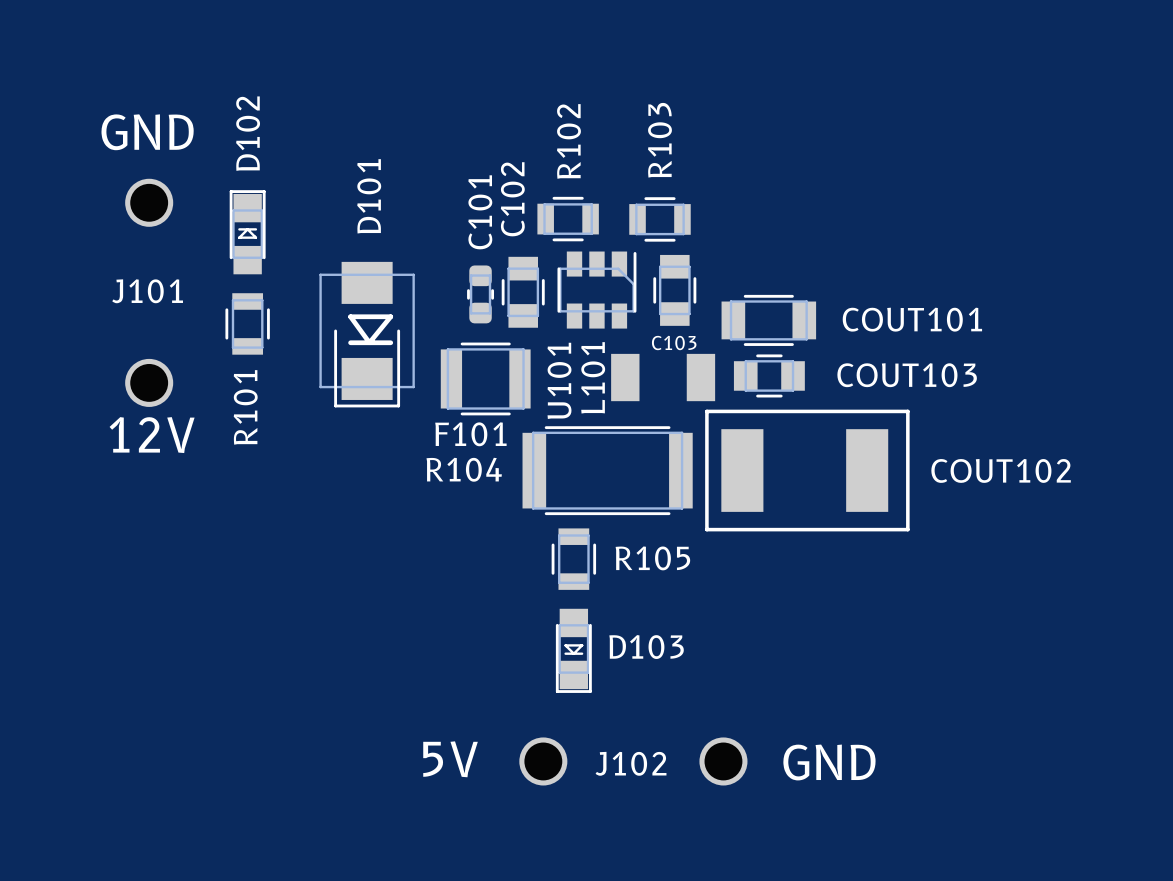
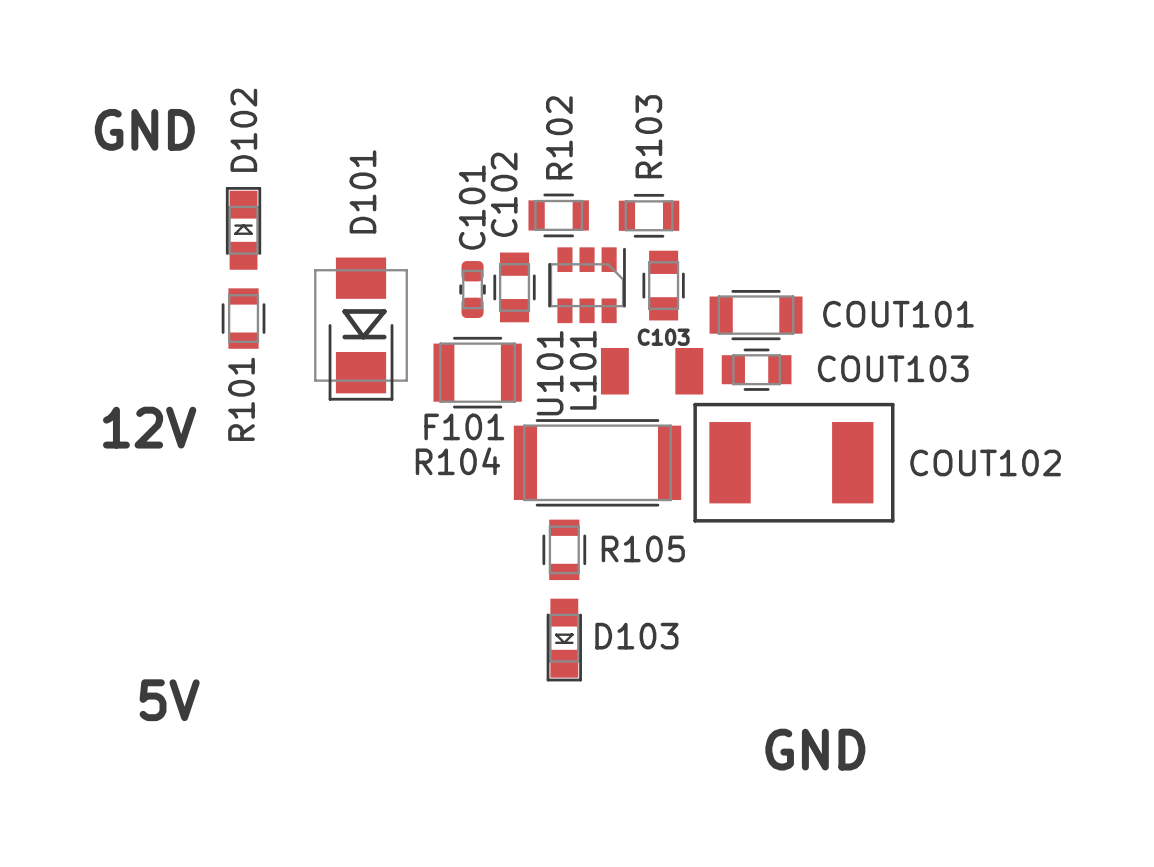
J101: (149, 292) -> none
text position: 5V (450, 759) -> 5V (169, 700)
J102: (633, 761) -> none

